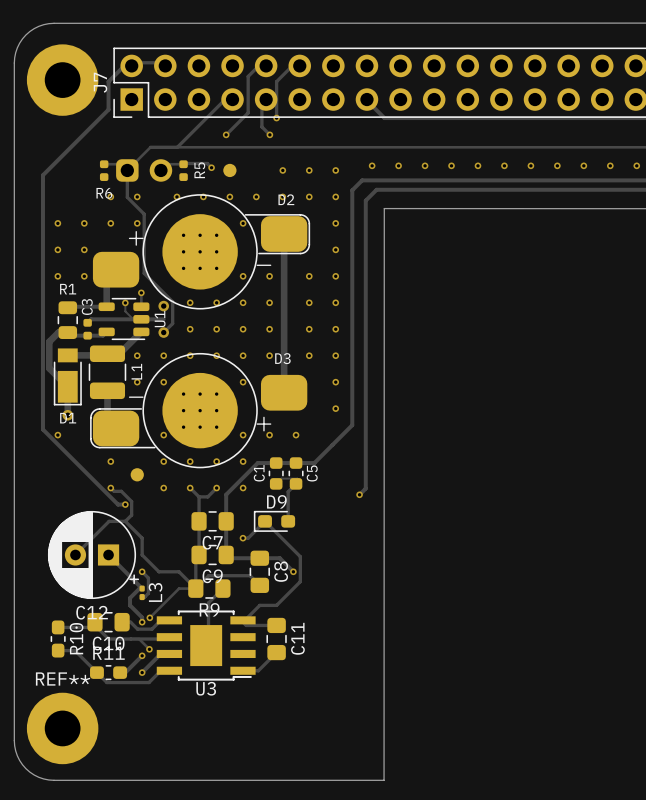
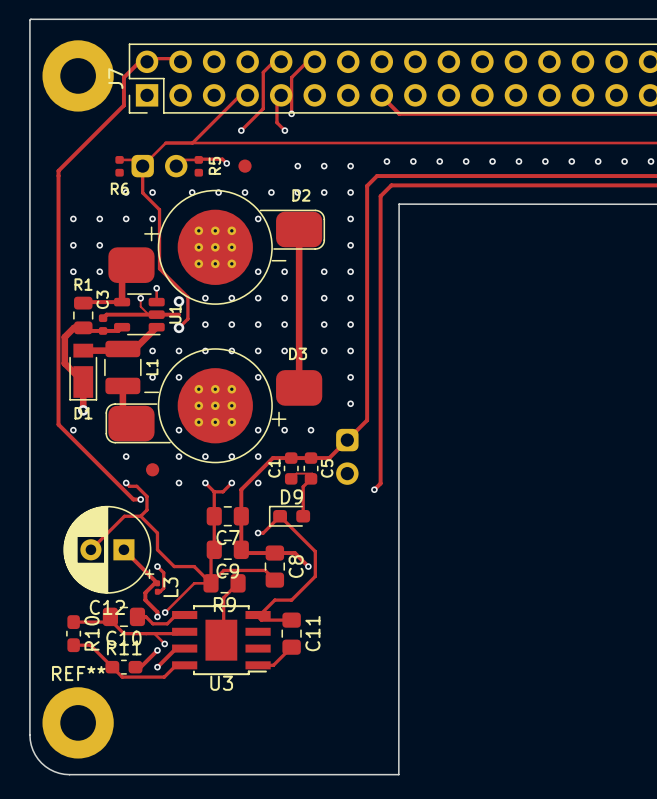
board edge: (54, 23) (38, 26) (25, 34) (17, 47) (14, 63) -> (69, 19) (30, 19) (29, 58)
part: none -> (347, 456)

